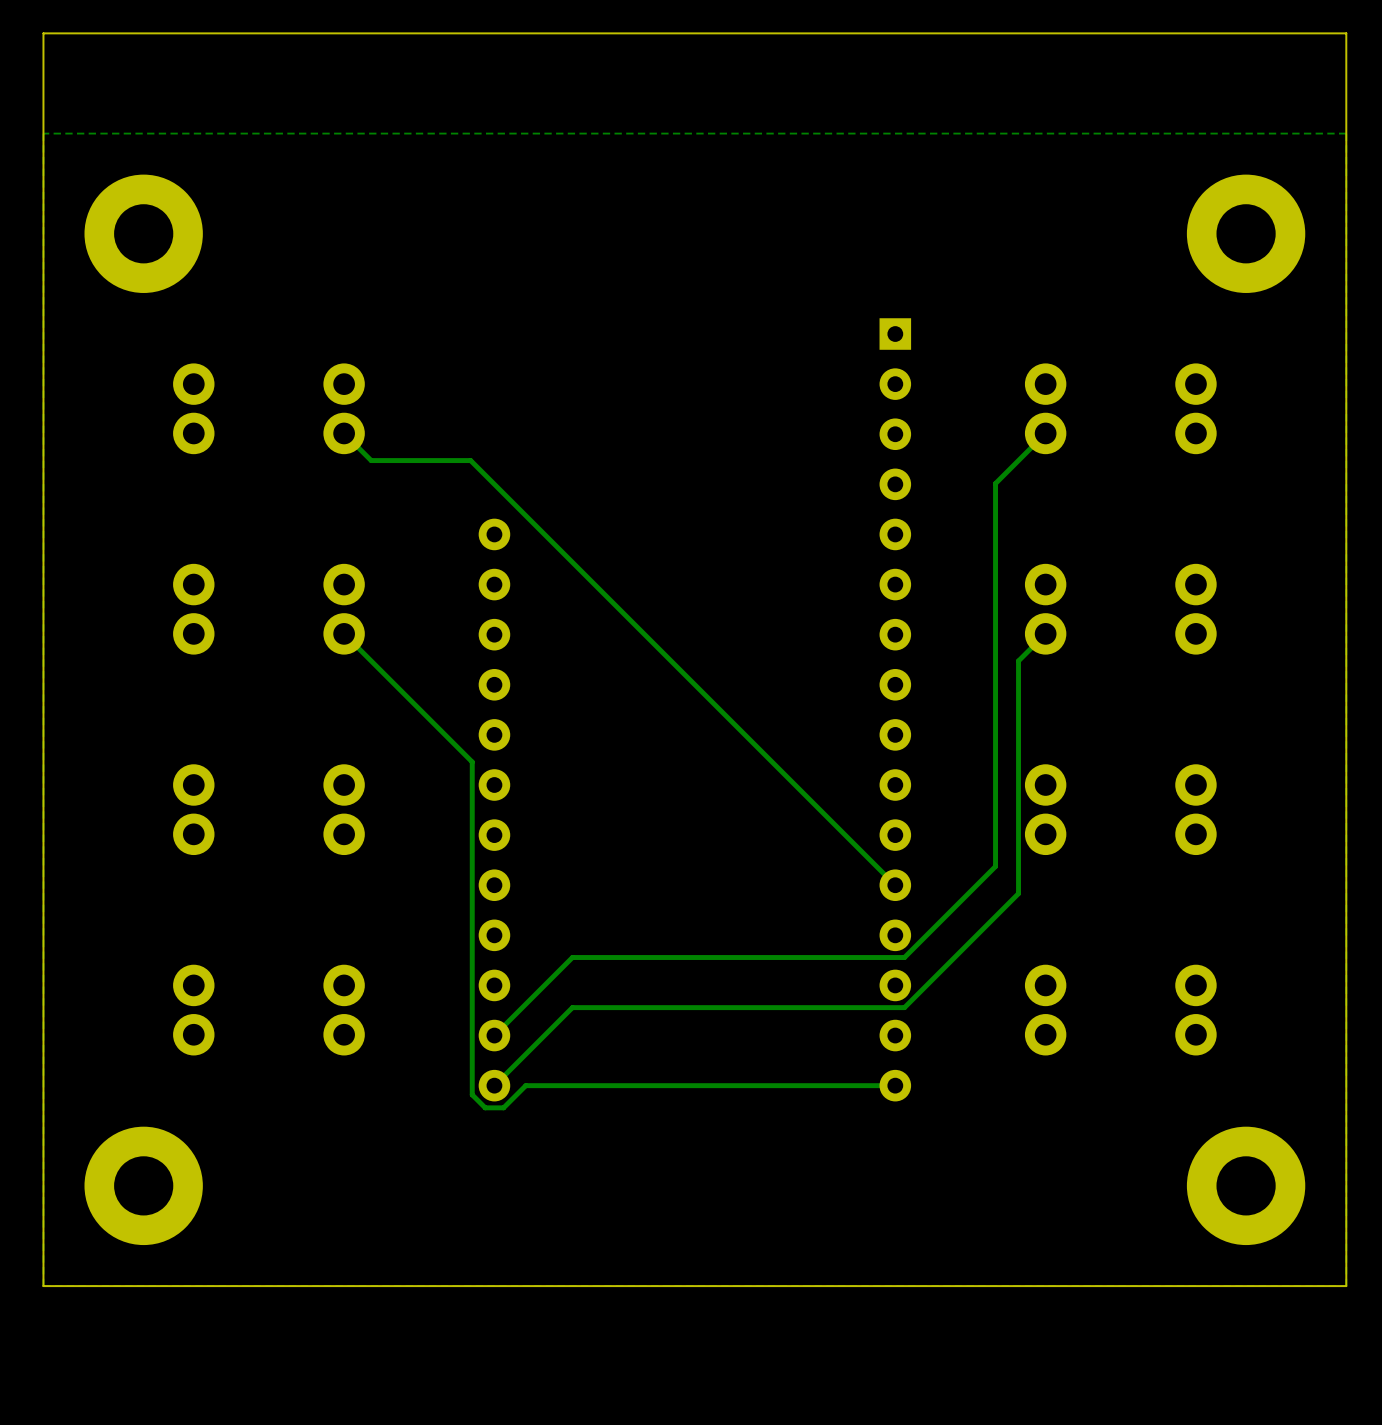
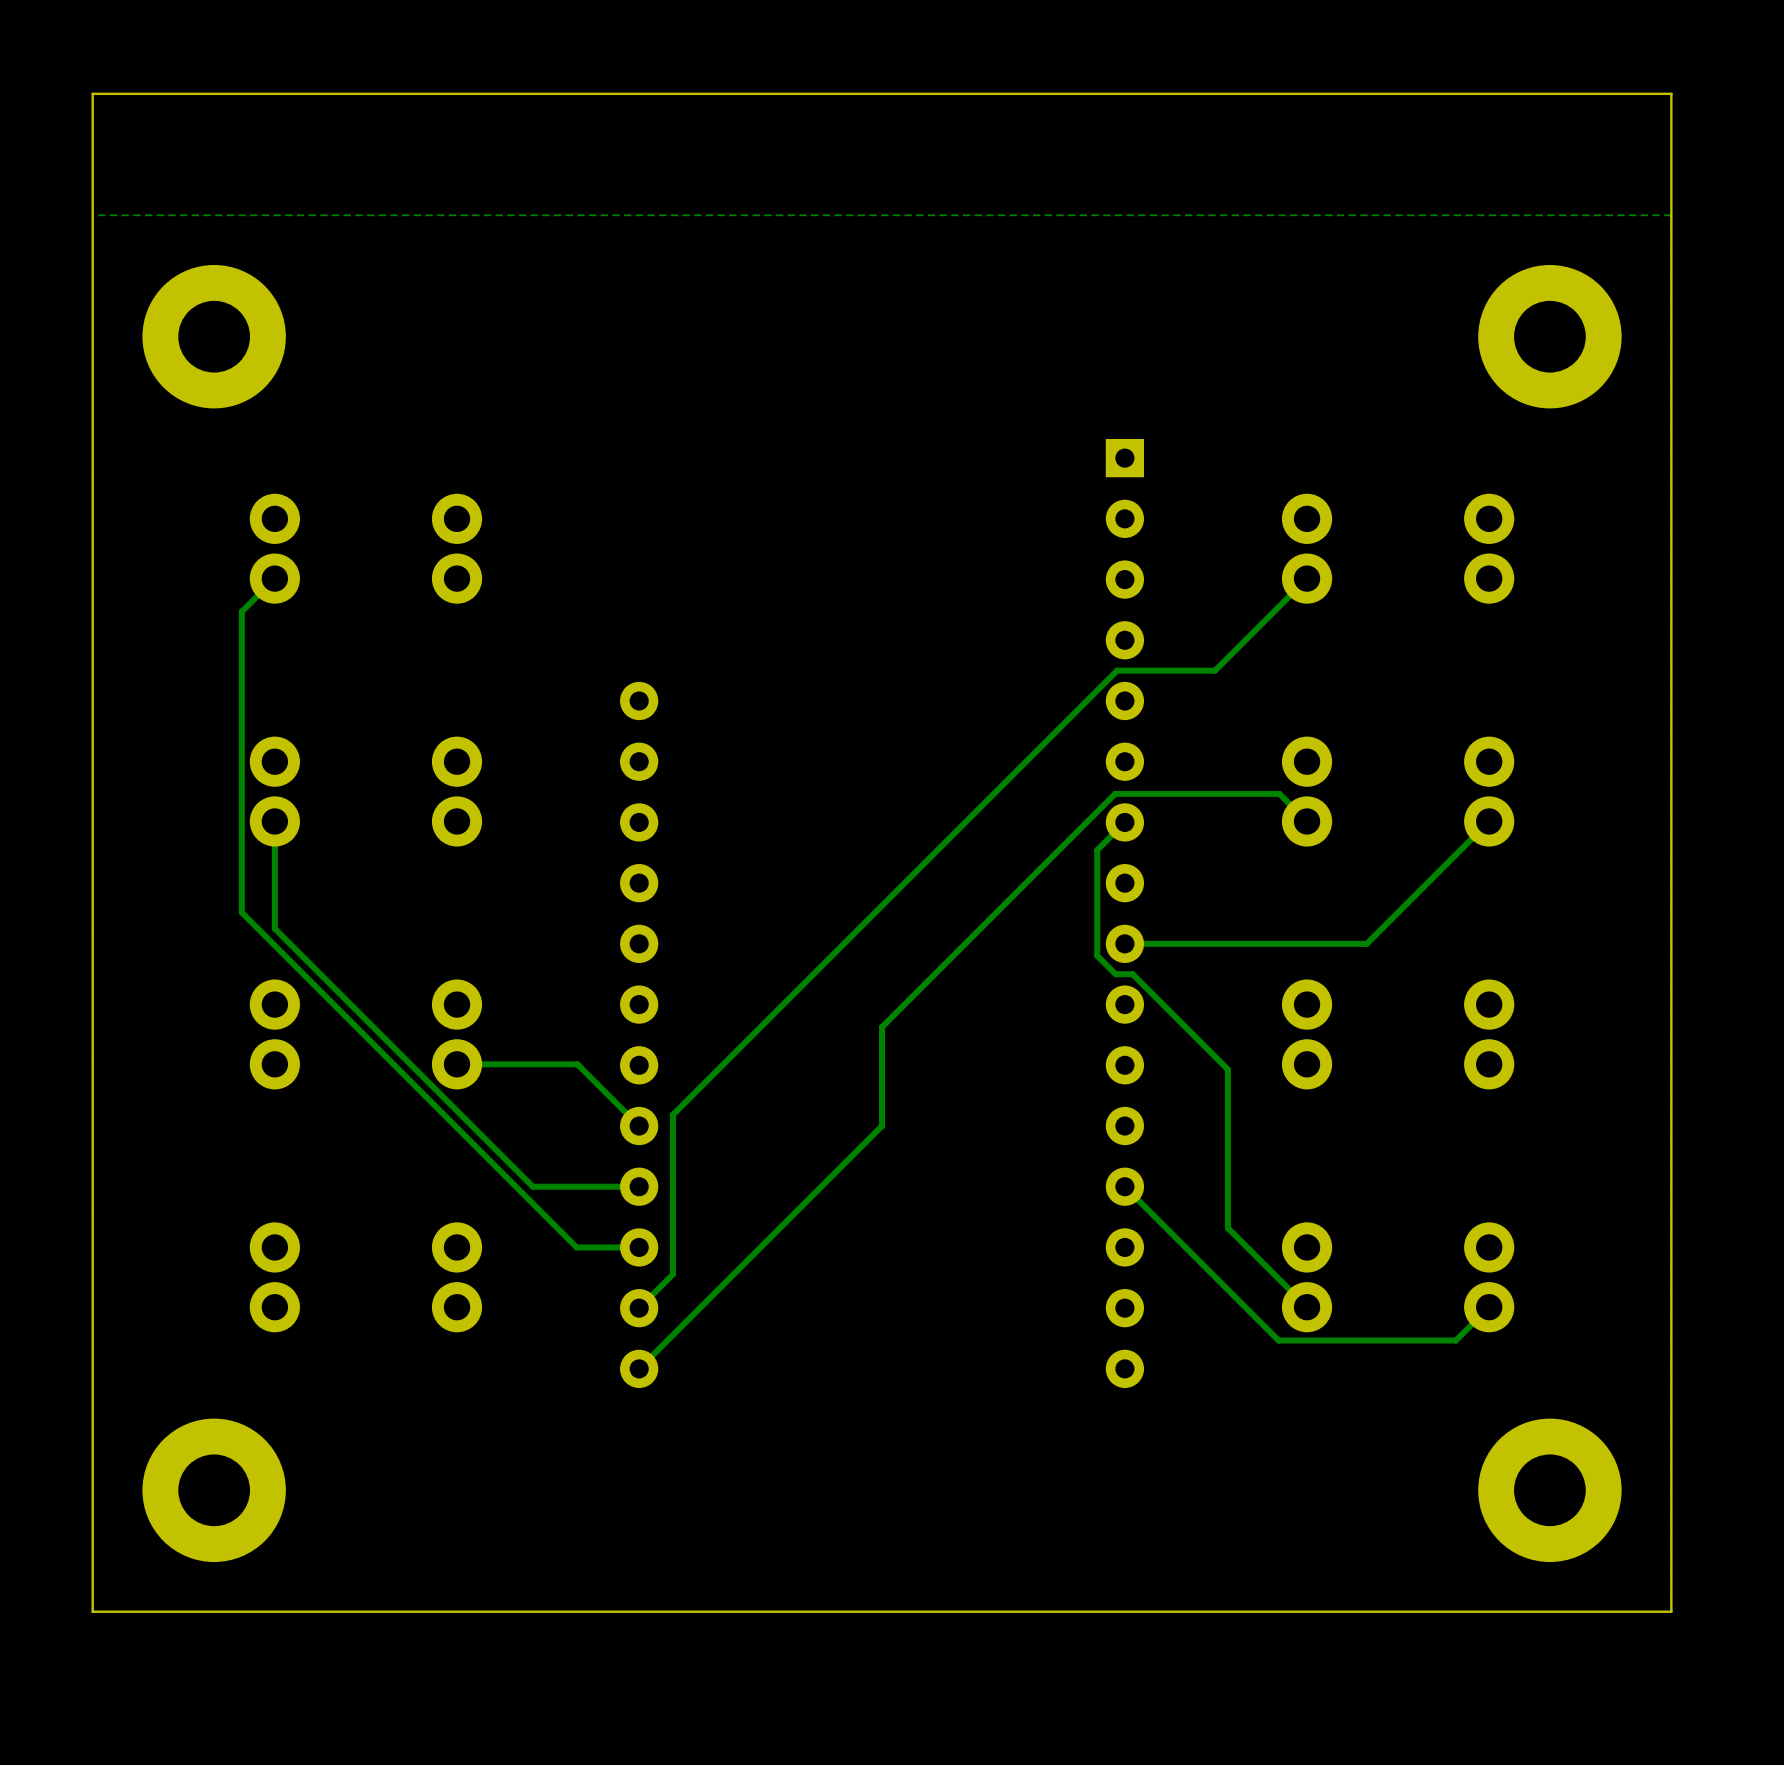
track: none -> (274, 578) (241, 611) (241, 912) (576, 1247) (639, 1247)
track: (344, 433) (371, 460) (470, 460) (895, 885) -> none
track: (995, 483) (995, 866) (904, 957) (572, 957) (522, 1007) -> (1246, 639) (1215, 670) (1117, 670) (672, 1114) (672, 1274)
track: none -> (274, 821) (274, 928) (532, 1186) (639, 1186)
track: (344, 633) (472, 762) (472, 1094) (485, 1107) (503, 1107) (525, 1085) (895, 1085) -> none
track: (1045, 633) (1018, 661) (1018, 893) (904, 1007) (572, 1007) -> (1307, 821) (1279, 793) (1115, 793) (882, 1027) (882, 1126) (733, 1274)
track: none -> (1489, 821) (1366, 943) (1124, 943)
track: none -> (1124, 822) (1097, 850) (1097, 955) (1115, 974) (1132, 974) (1227, 1069) (1227, 1228) (1307, 1307)
track: none -> (457, 1064) (577, 1064) (639, 1126)
track: none -> (1124, 1186) (1278, 1340) (1455, 1340) (1489, 1307)

